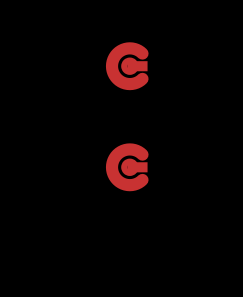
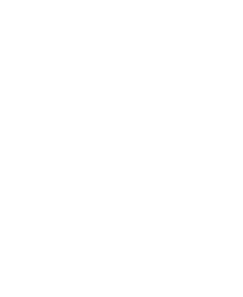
part: (127, 66) -> none
part: (127, 167) -> none

